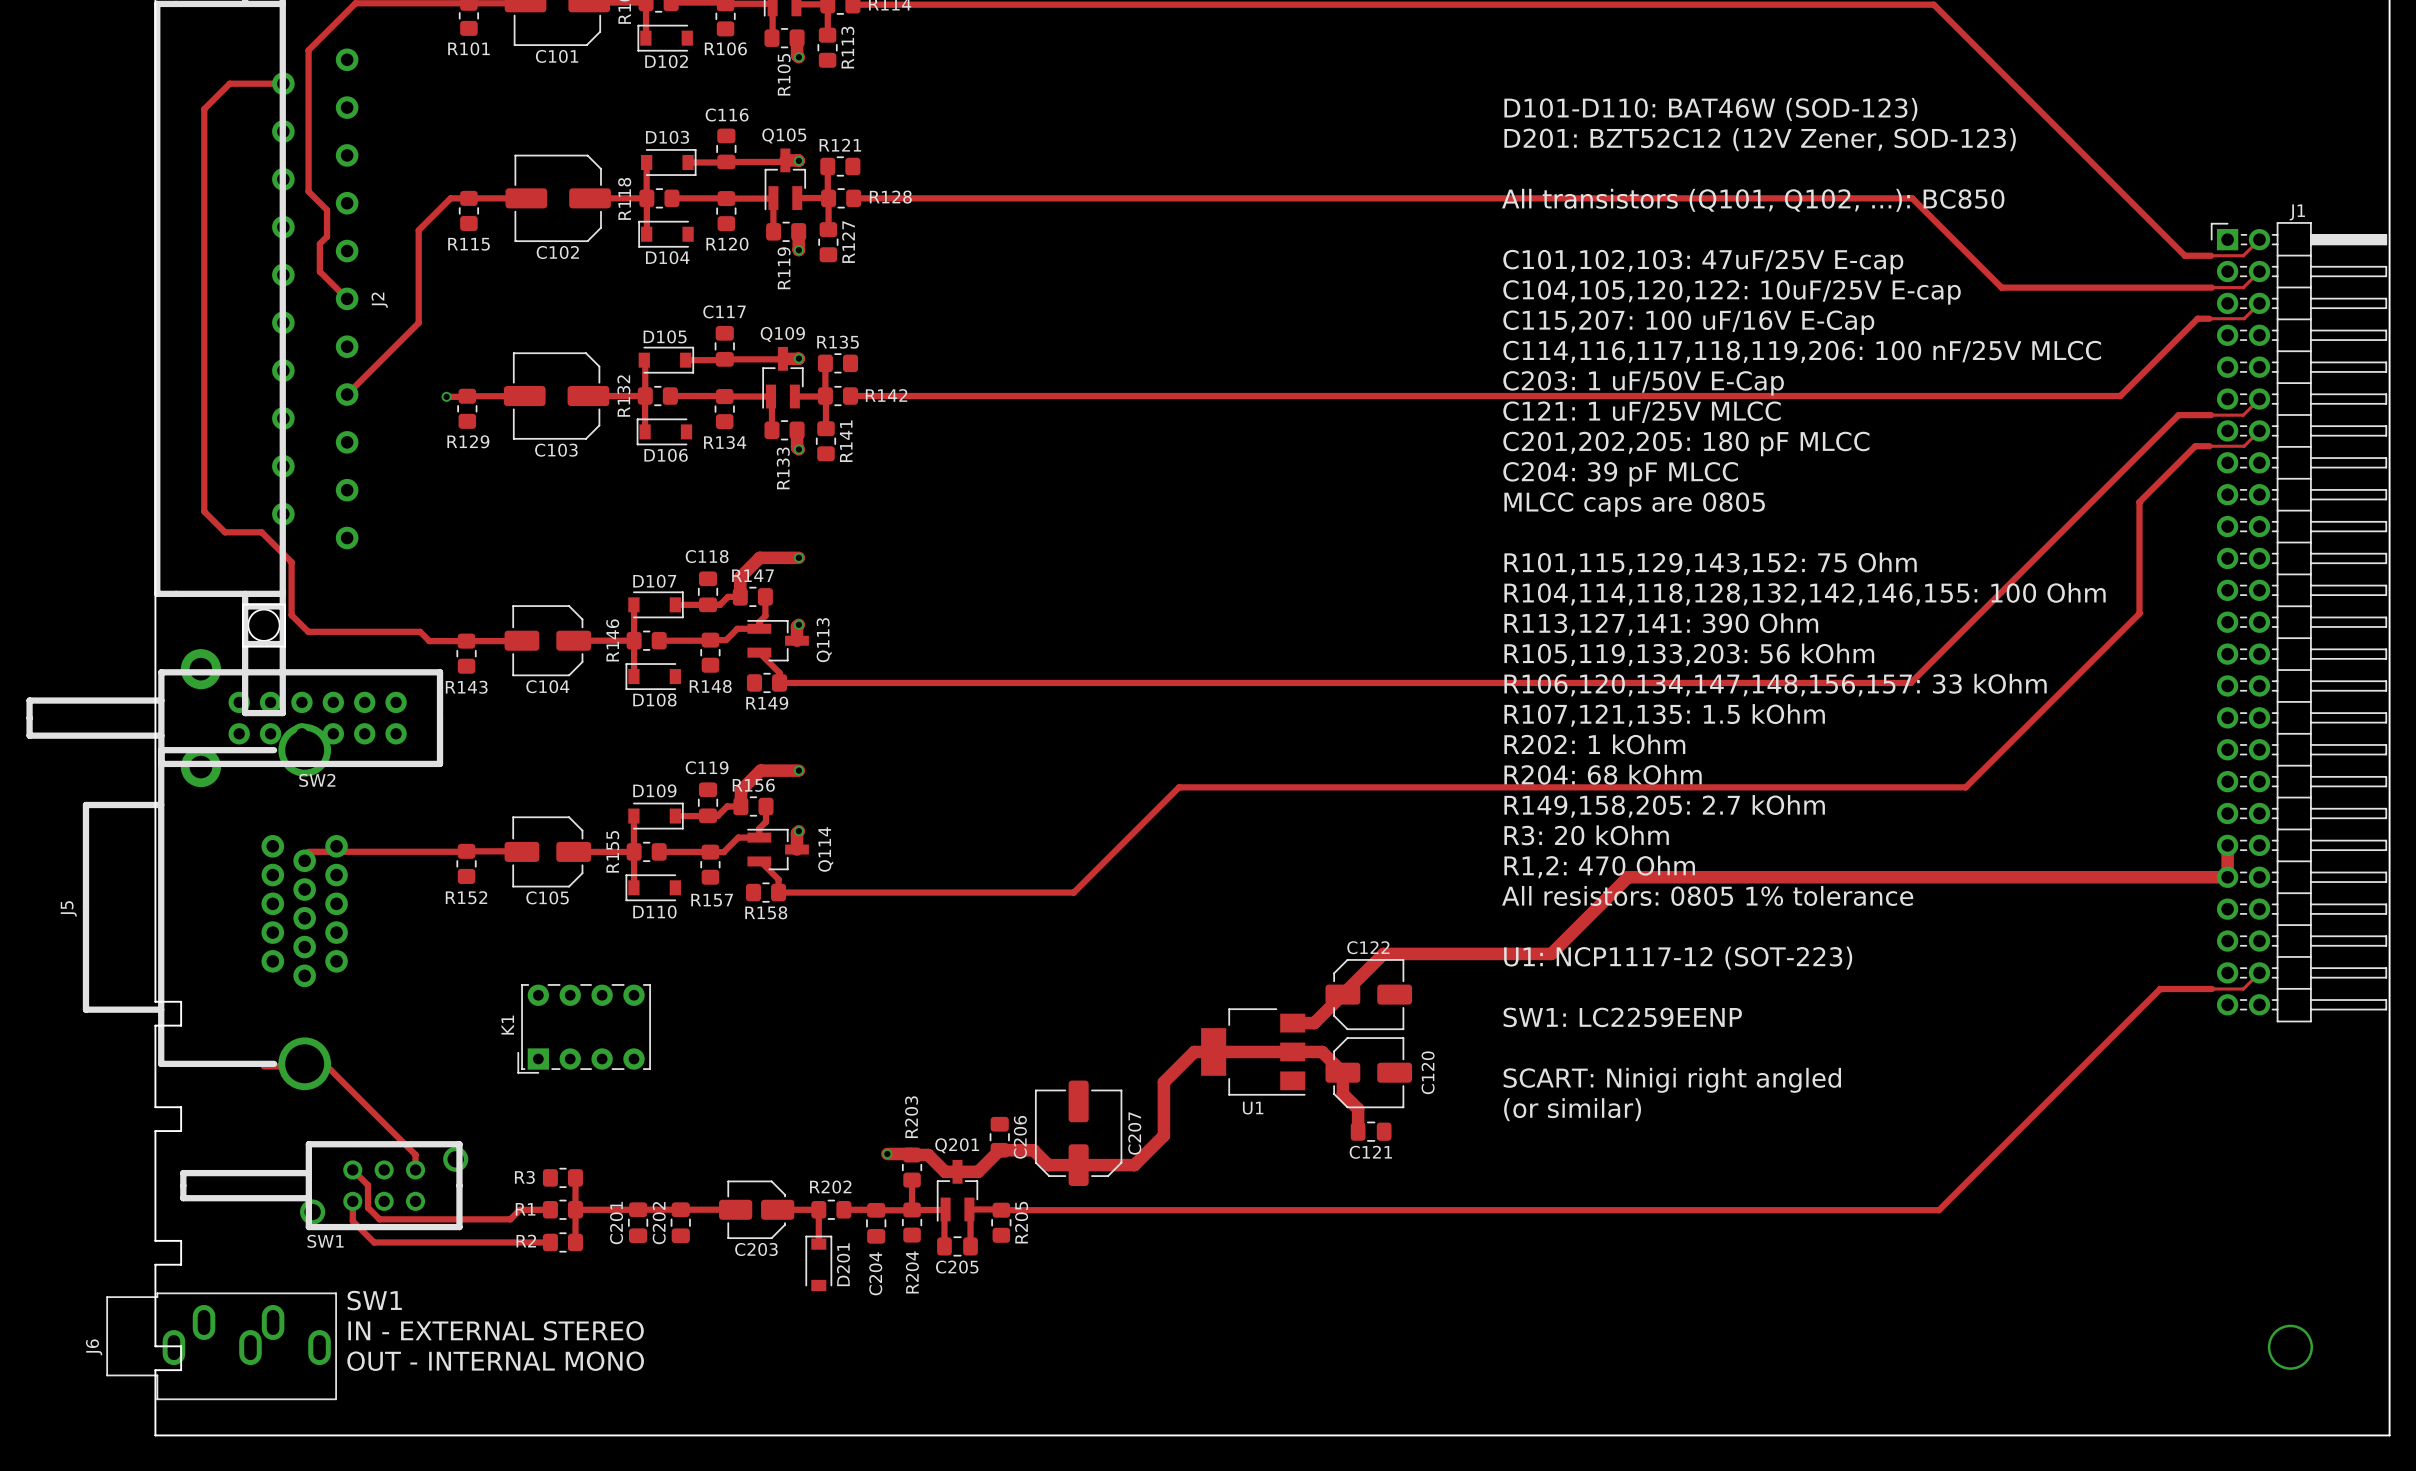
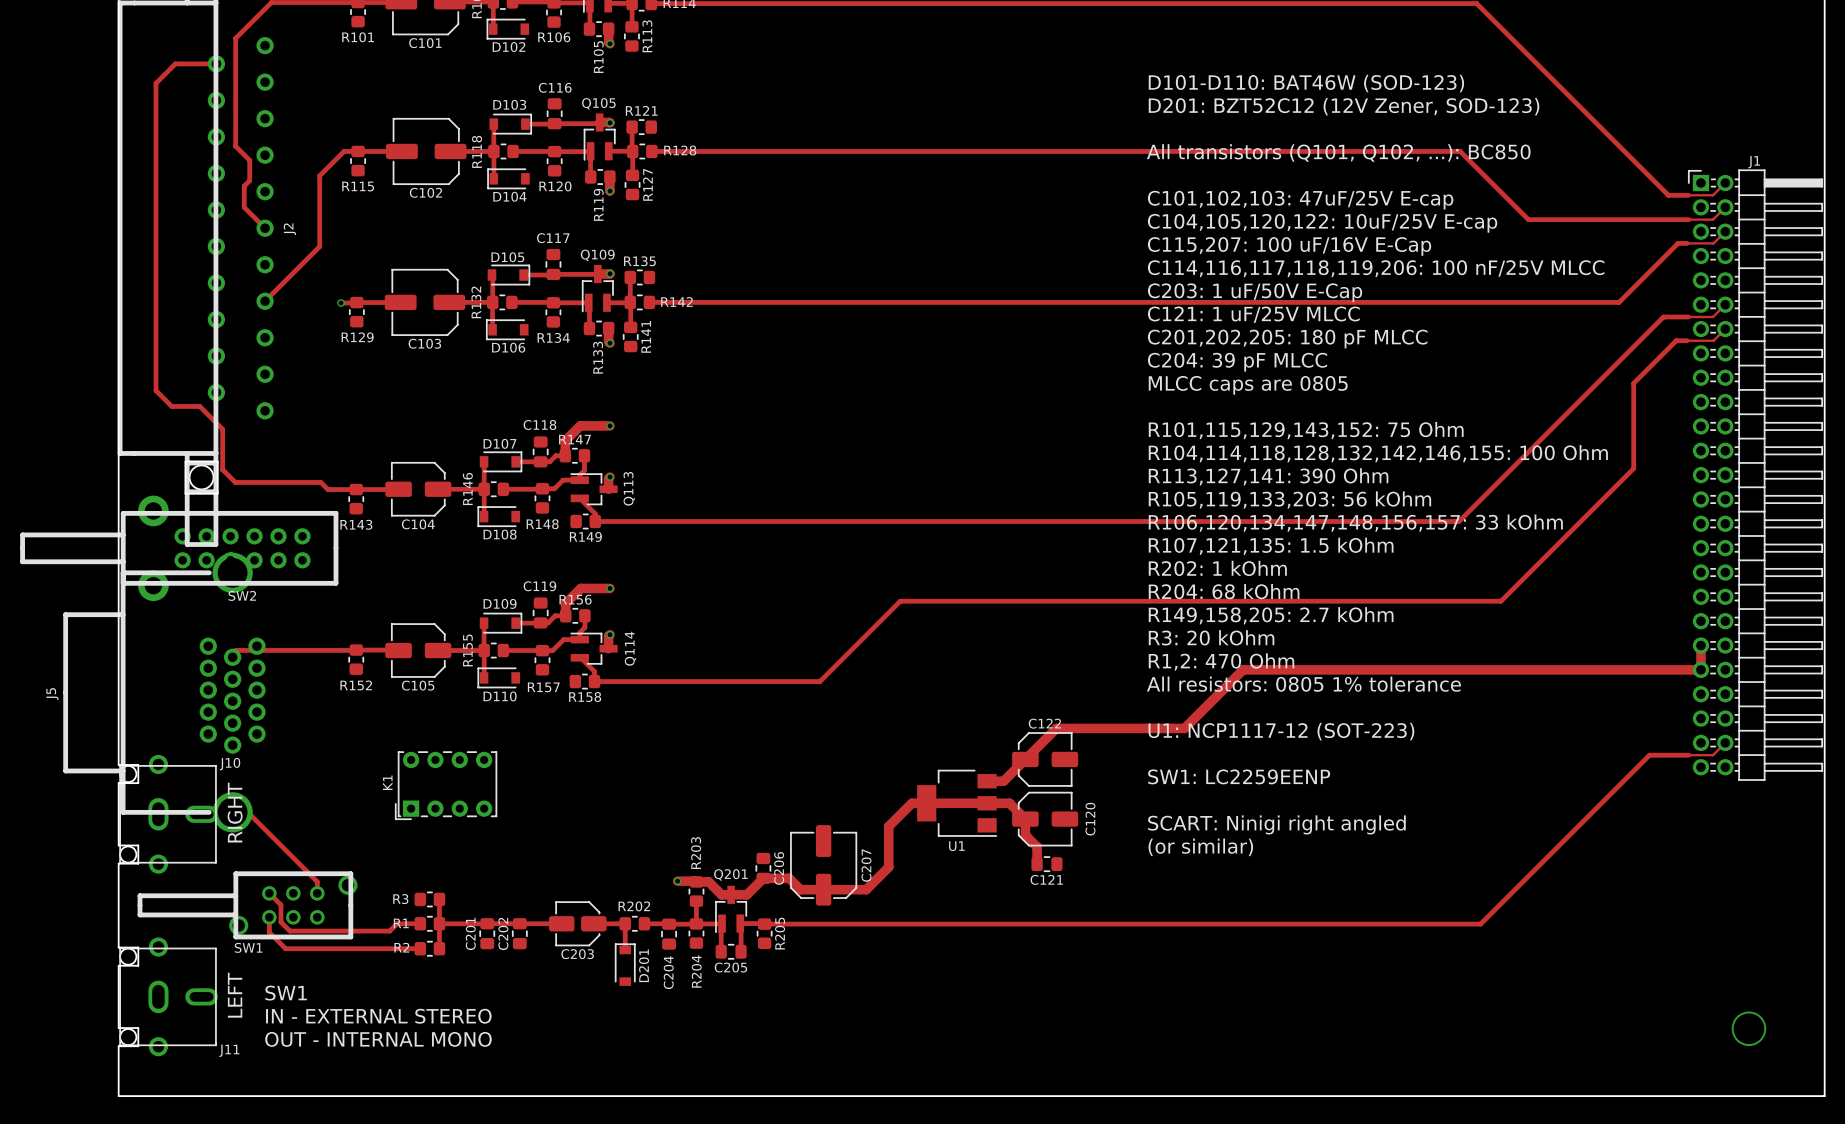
text: none -> RIGHT (235, 812)
J10: none -> (168, 814)
text: none -> LEFT (235, 995)
J11: none -> (168, 996)
J6: (221, 1346) -> none

